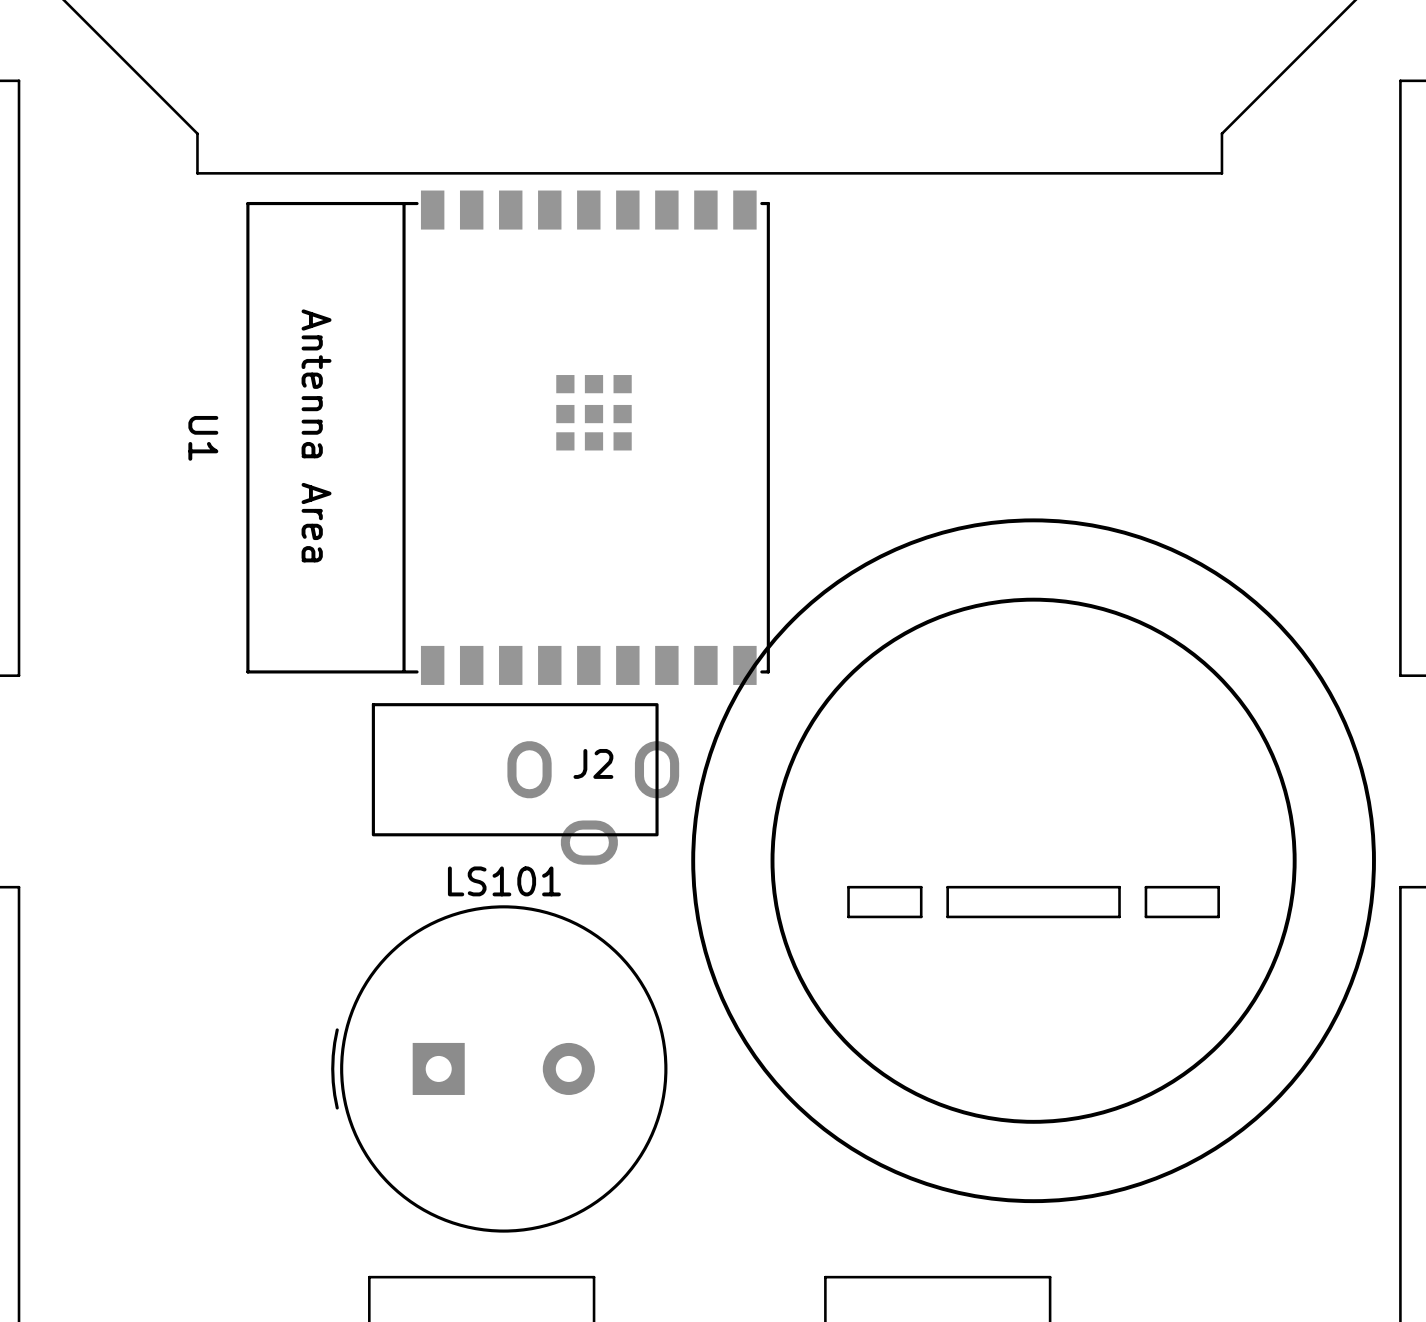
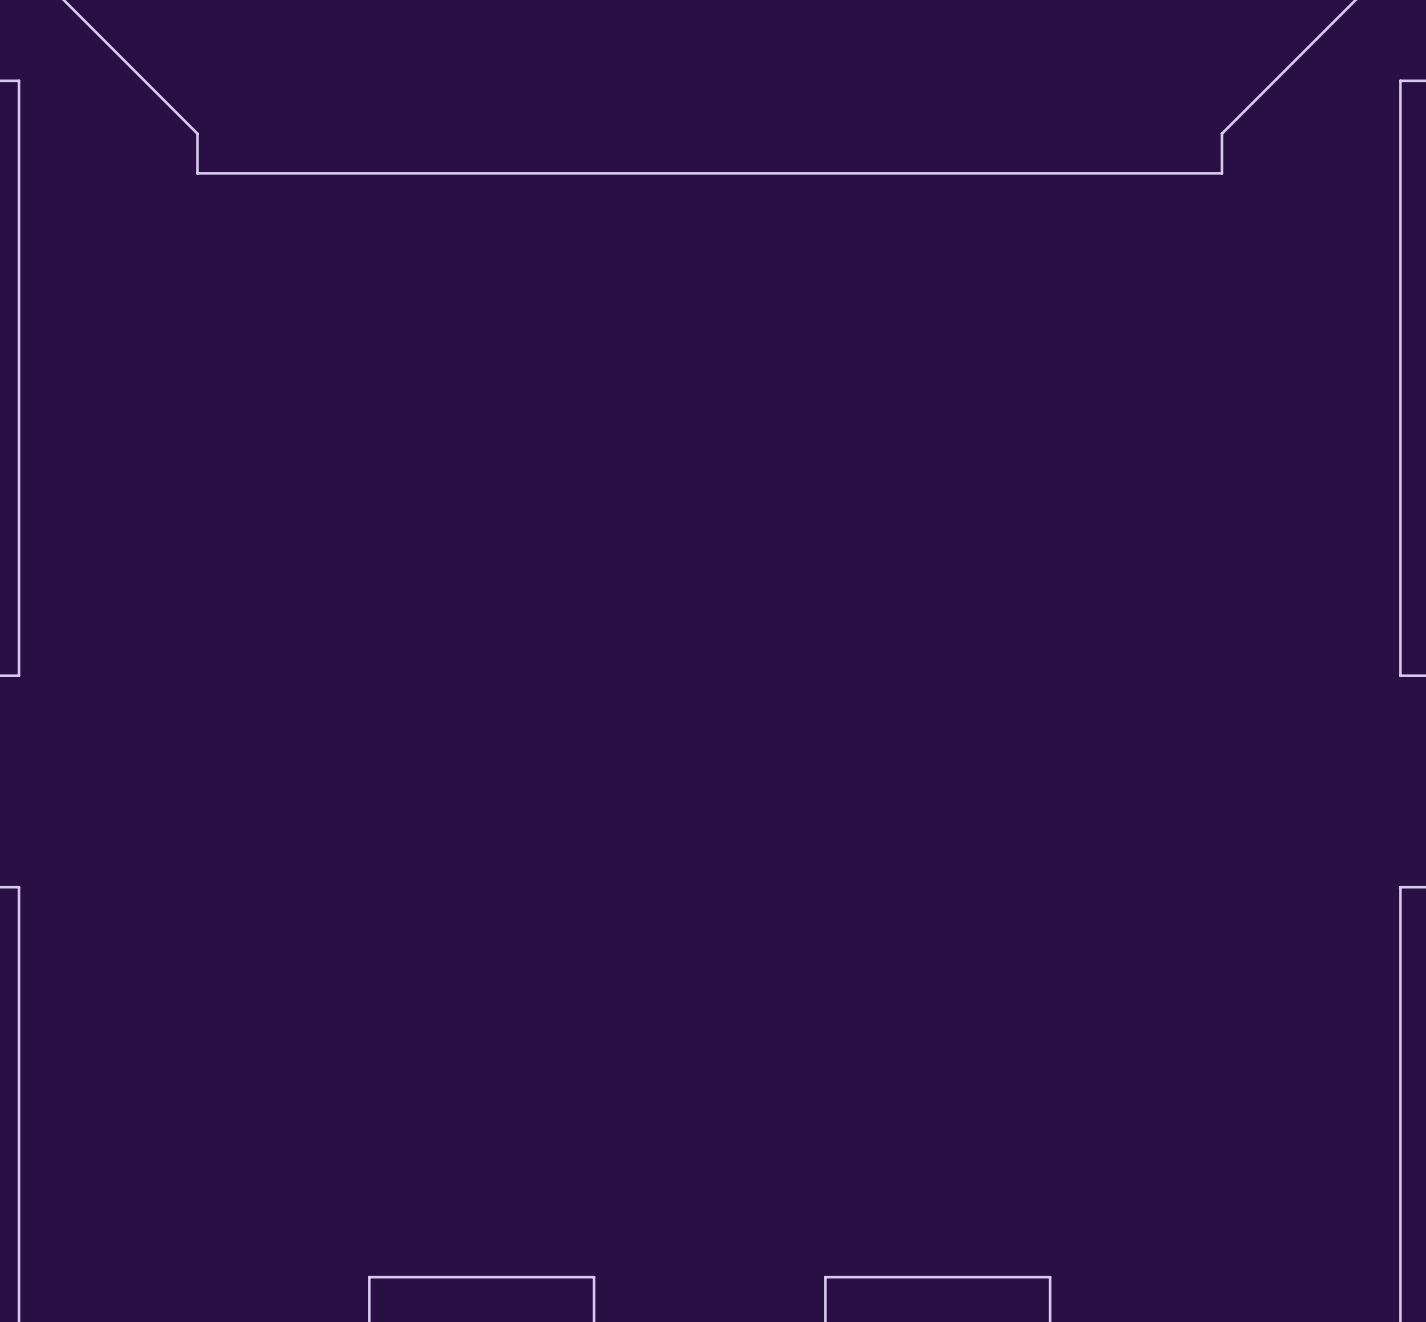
U1: (508, 437) -> none
drawing: [691, 518, 1376, 1204] -> none
J2: (525, 783) -> none
board edge: (921, 887) (848, 887) (848, 916) (921, 916) (921, 887) -> none
board edge: (1119, 887) (947, 887) (947, 916) (1119, 916) (1119, 887) -> none
board edge: (1218, 887) (1145, 887) (1145, 916) (1218, 916) (1218, 887) -> none
LS101: (499, 1068) -> none

